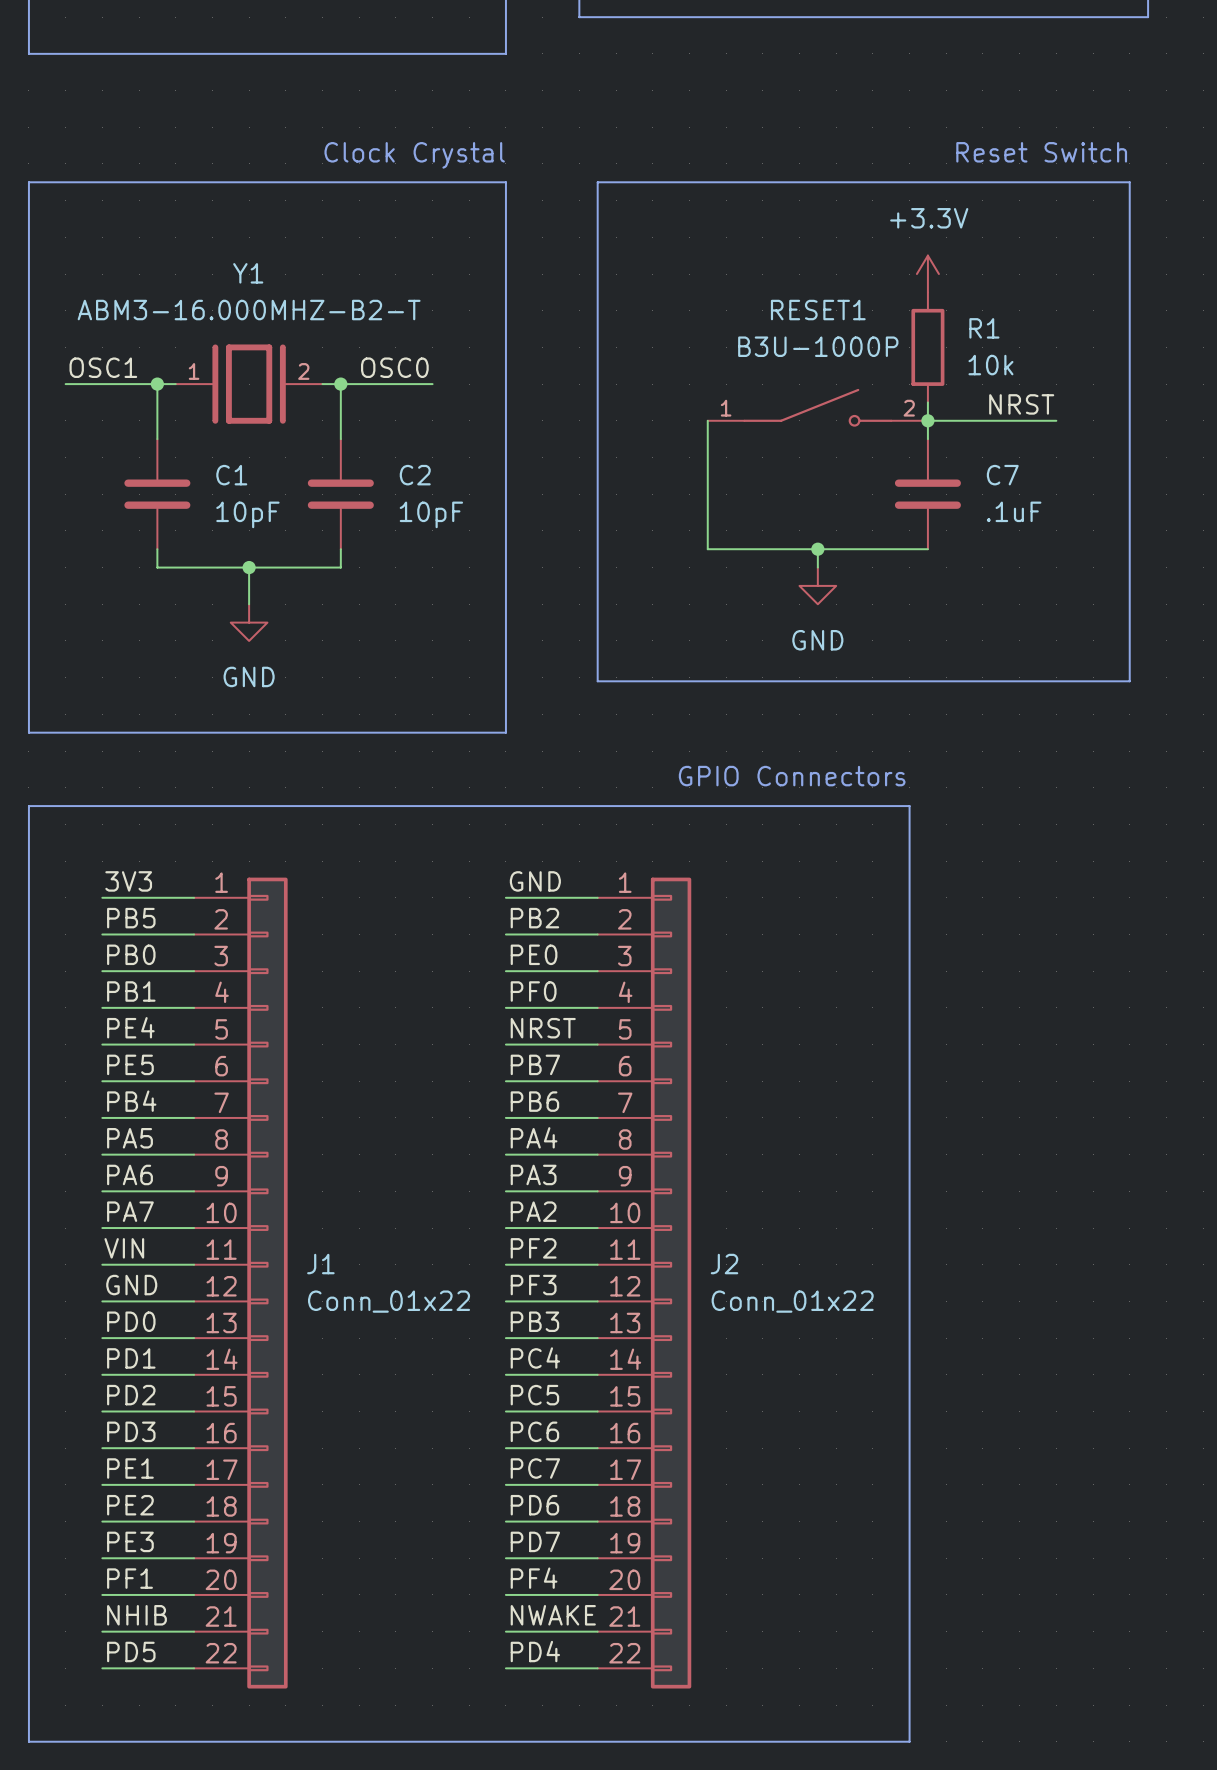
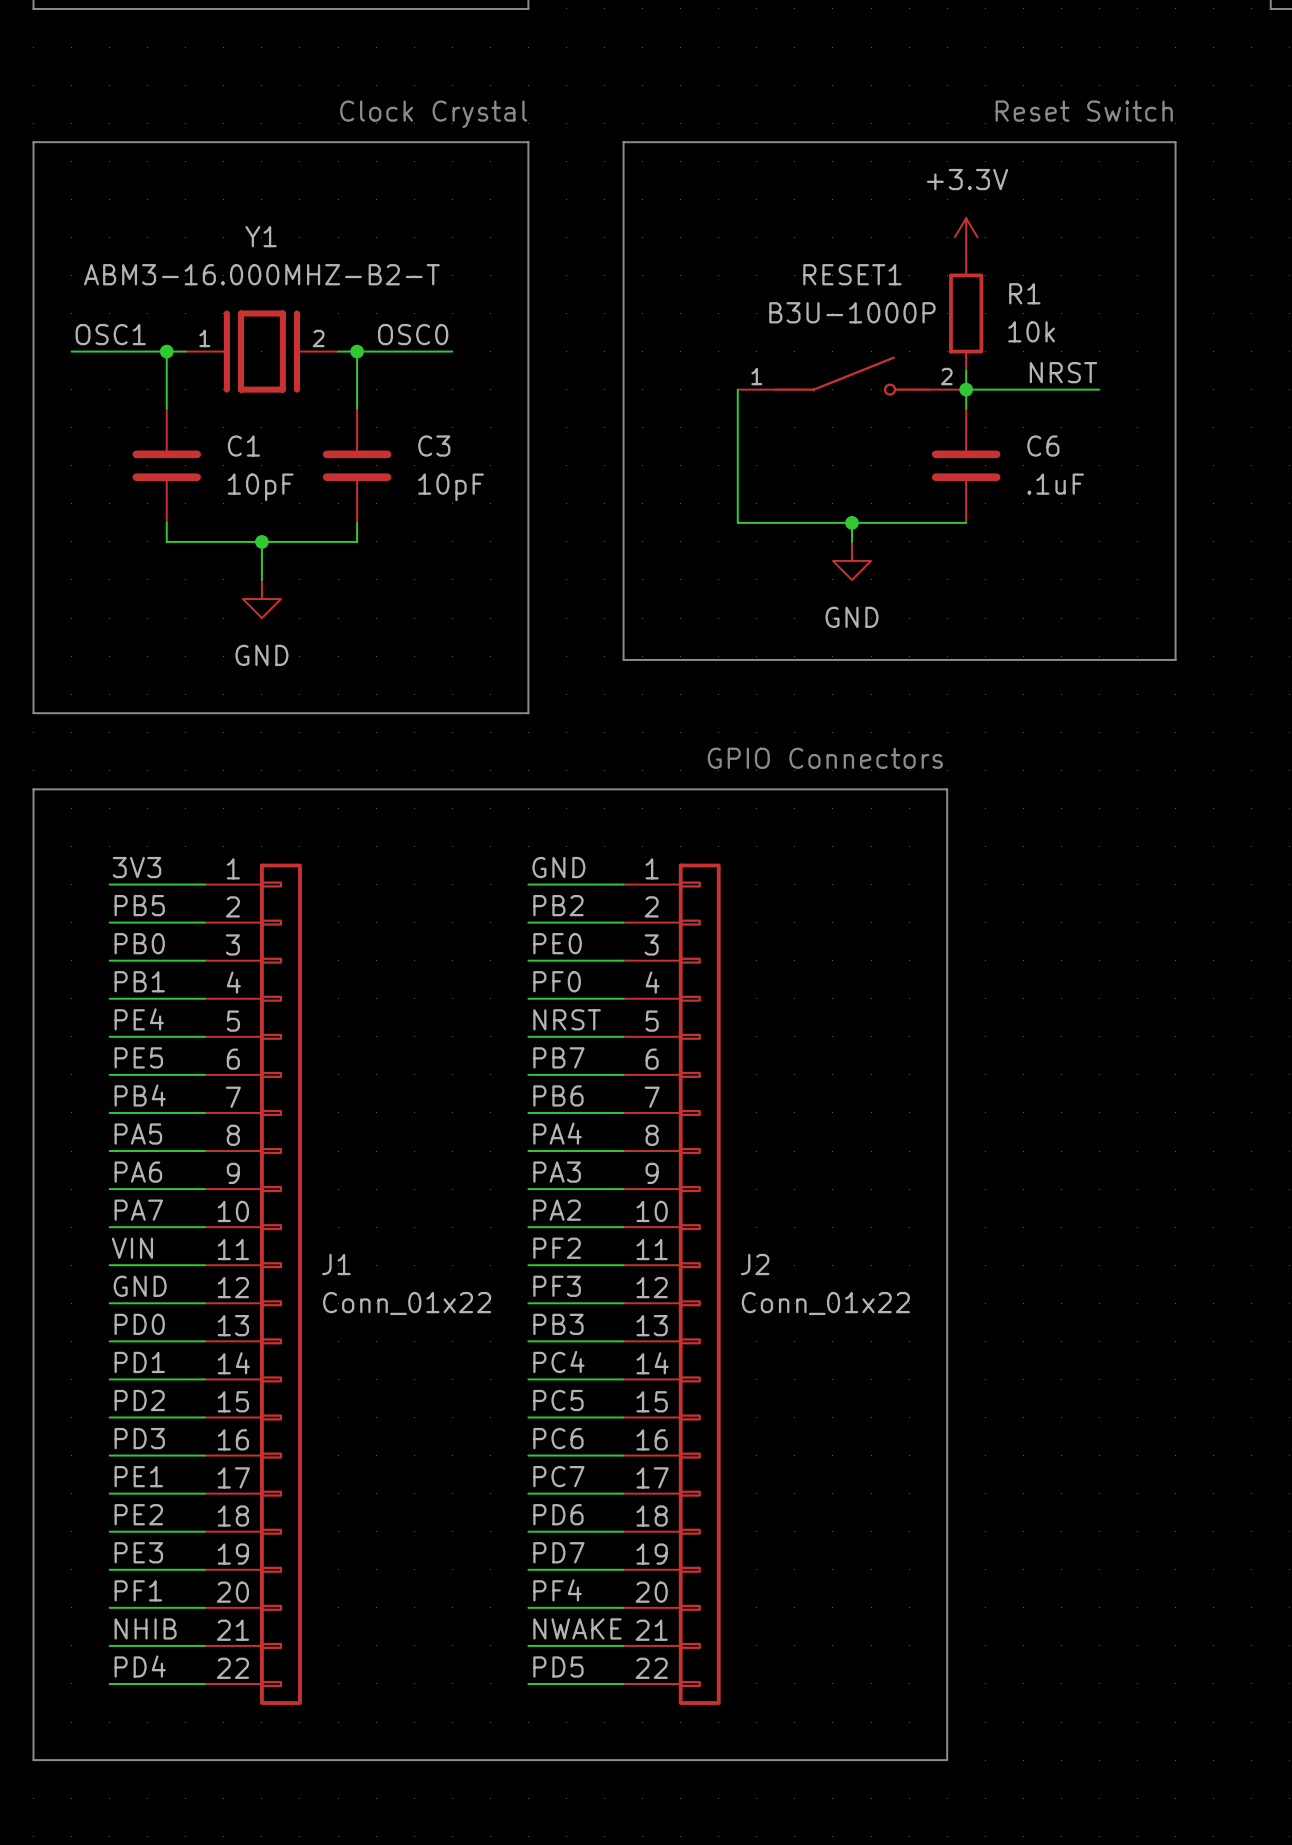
C2 name: C2 (415, 475) -> C3 (434, 446)
C7 name: C7 (1002, 475) -> C6 (1043, 446)
label: PD5 (131, 1651) -> PD4 (140, 1666)
label: PD4 (535, 1651) -> PD5 (558, 1666)

